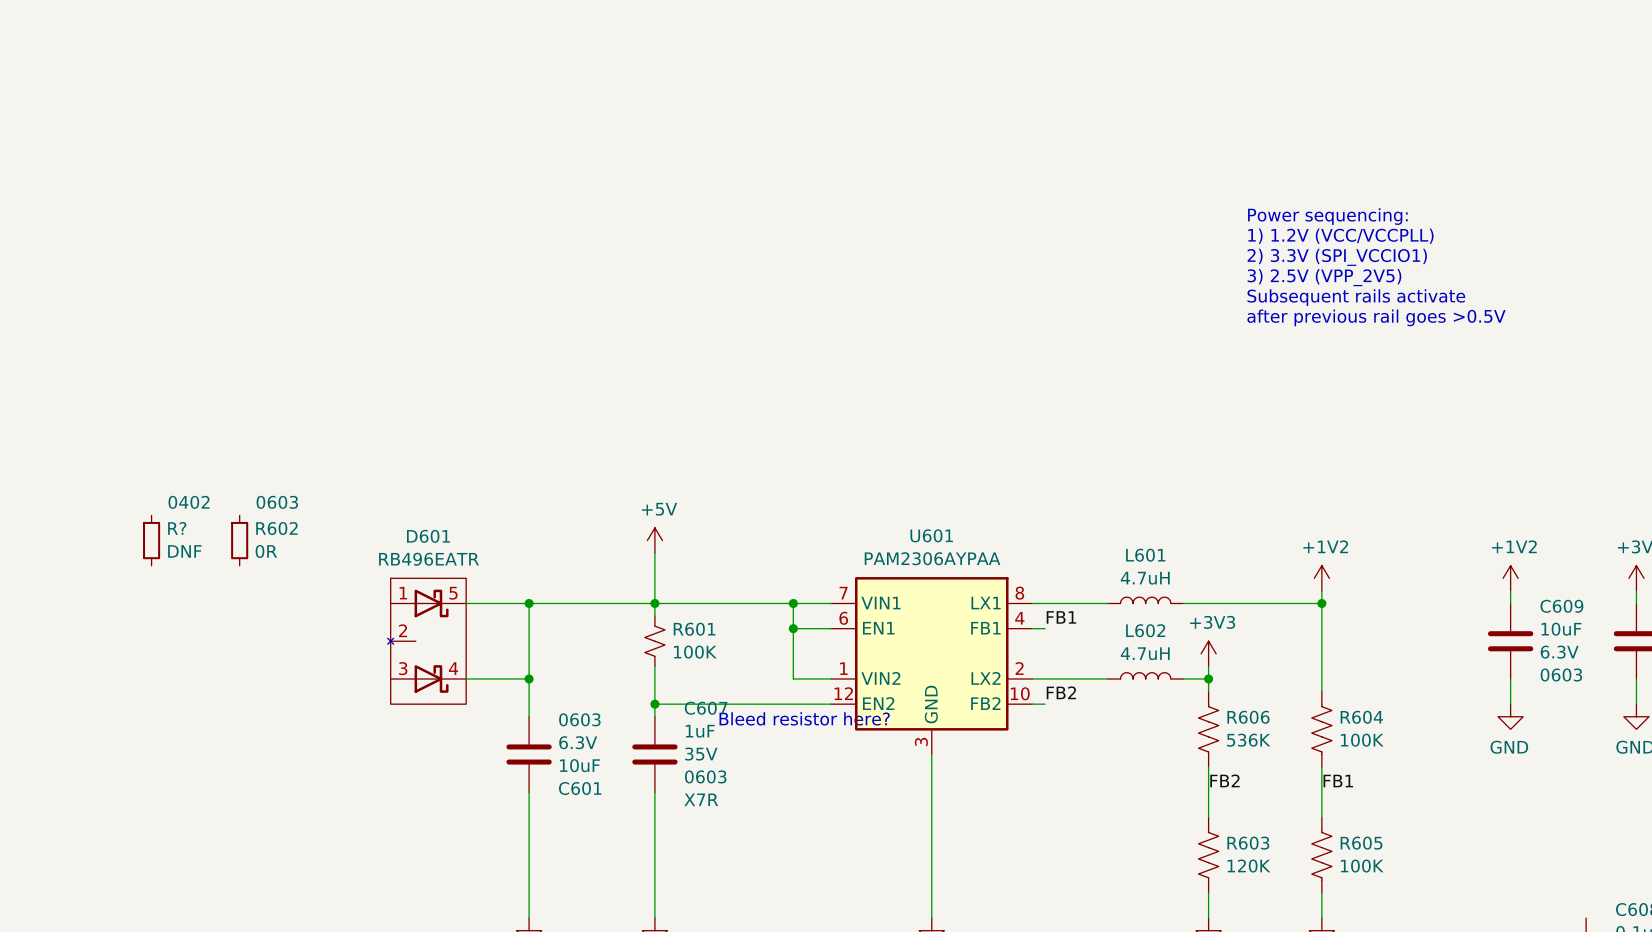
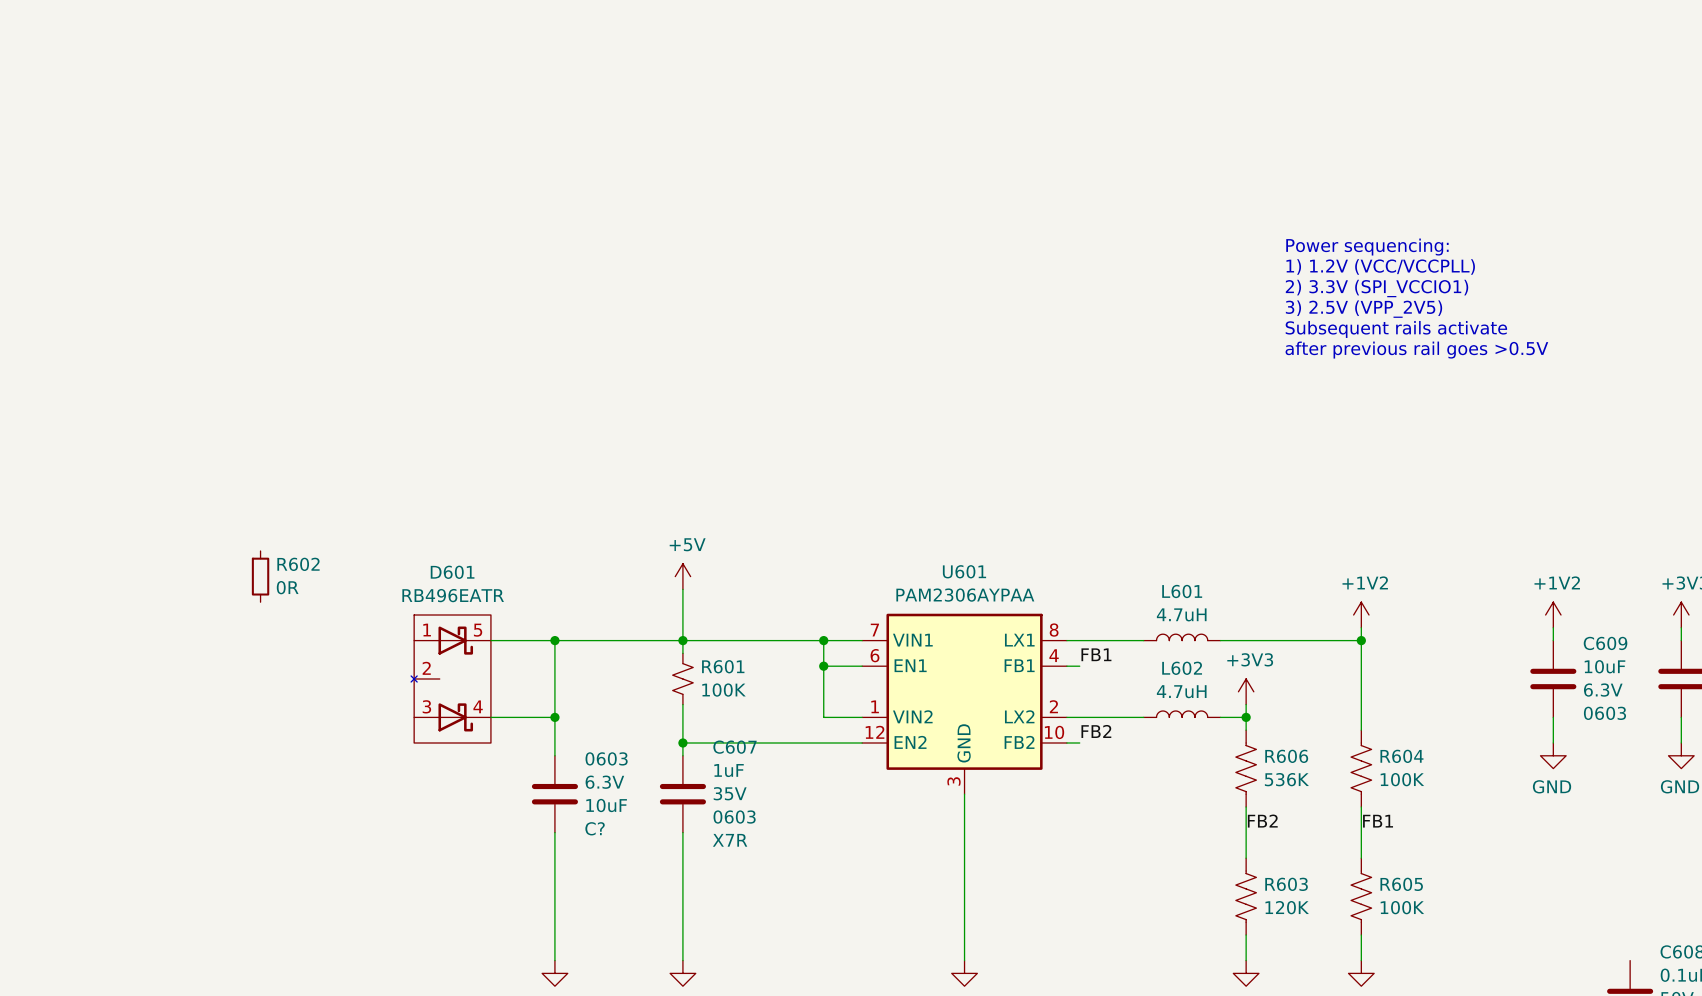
R602 text: 0603 (277, 502) -> none
R?: DNF (151, 540) -> none
text: Bleed resistor here? (804, 718) -> none
C601 name: C601 (580, 788) -> C? (595, 828)

